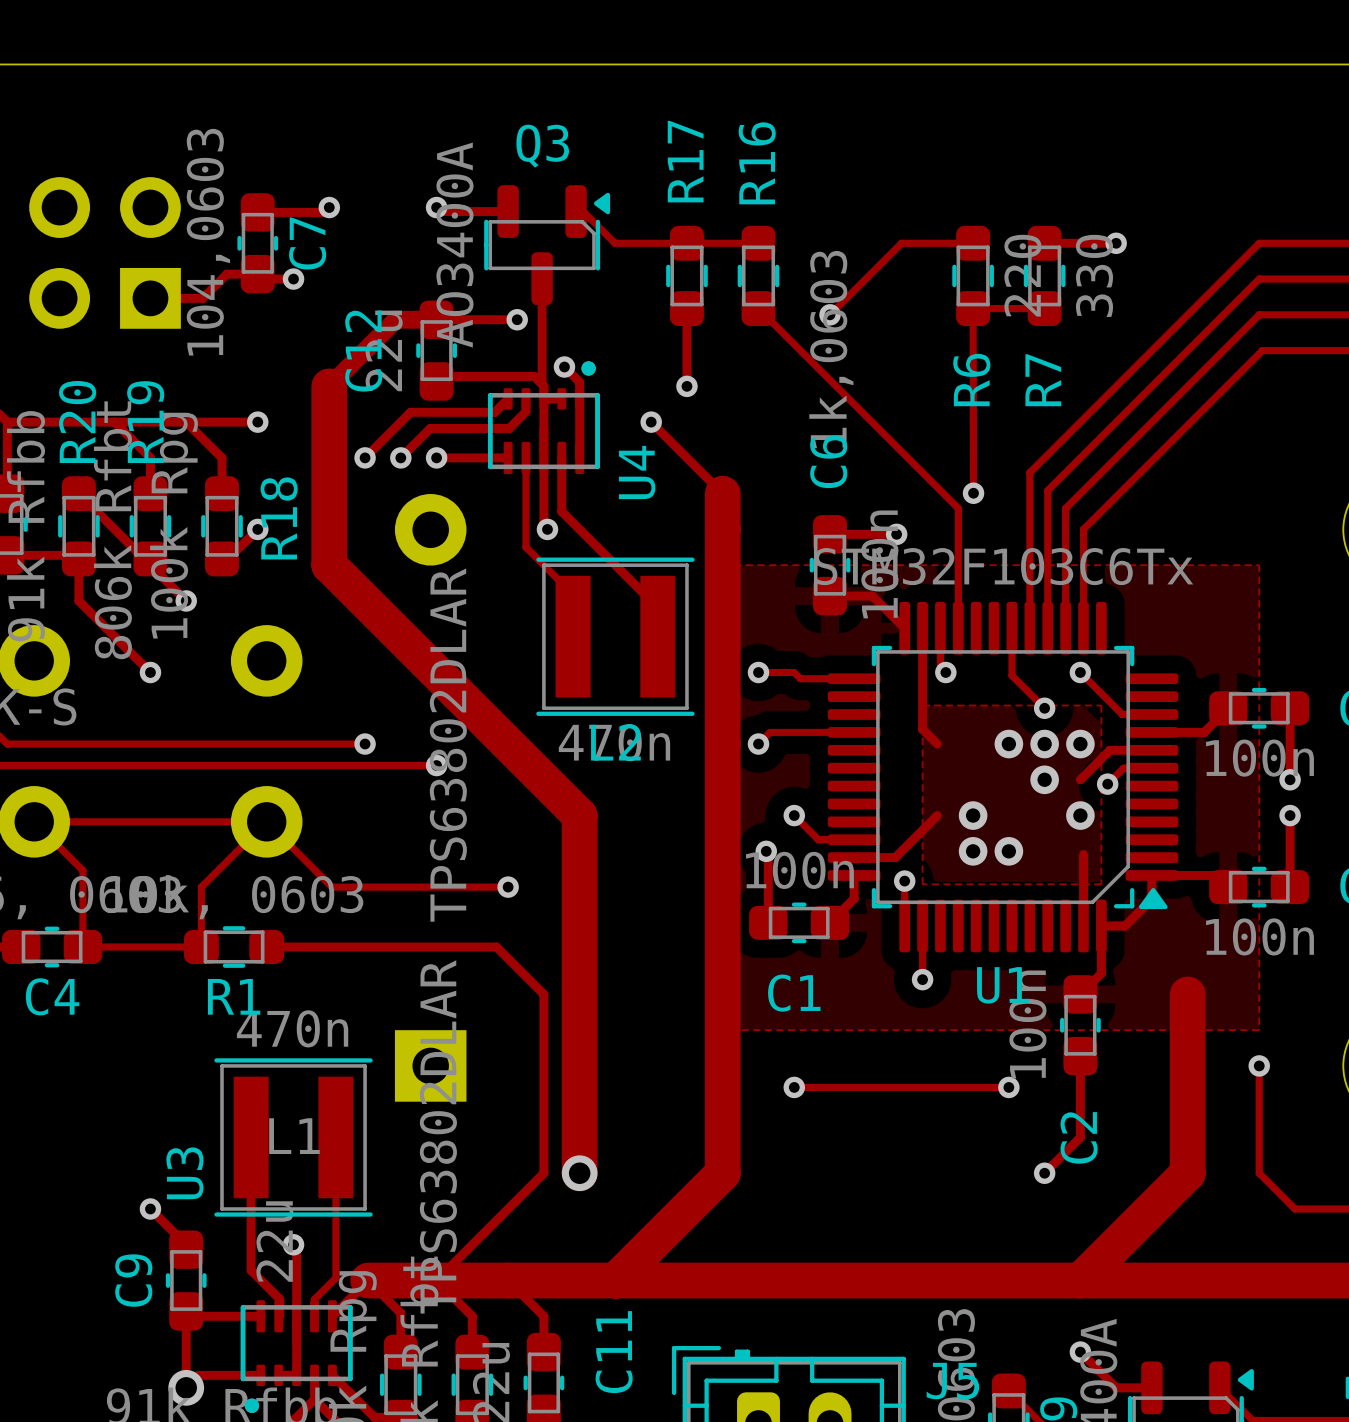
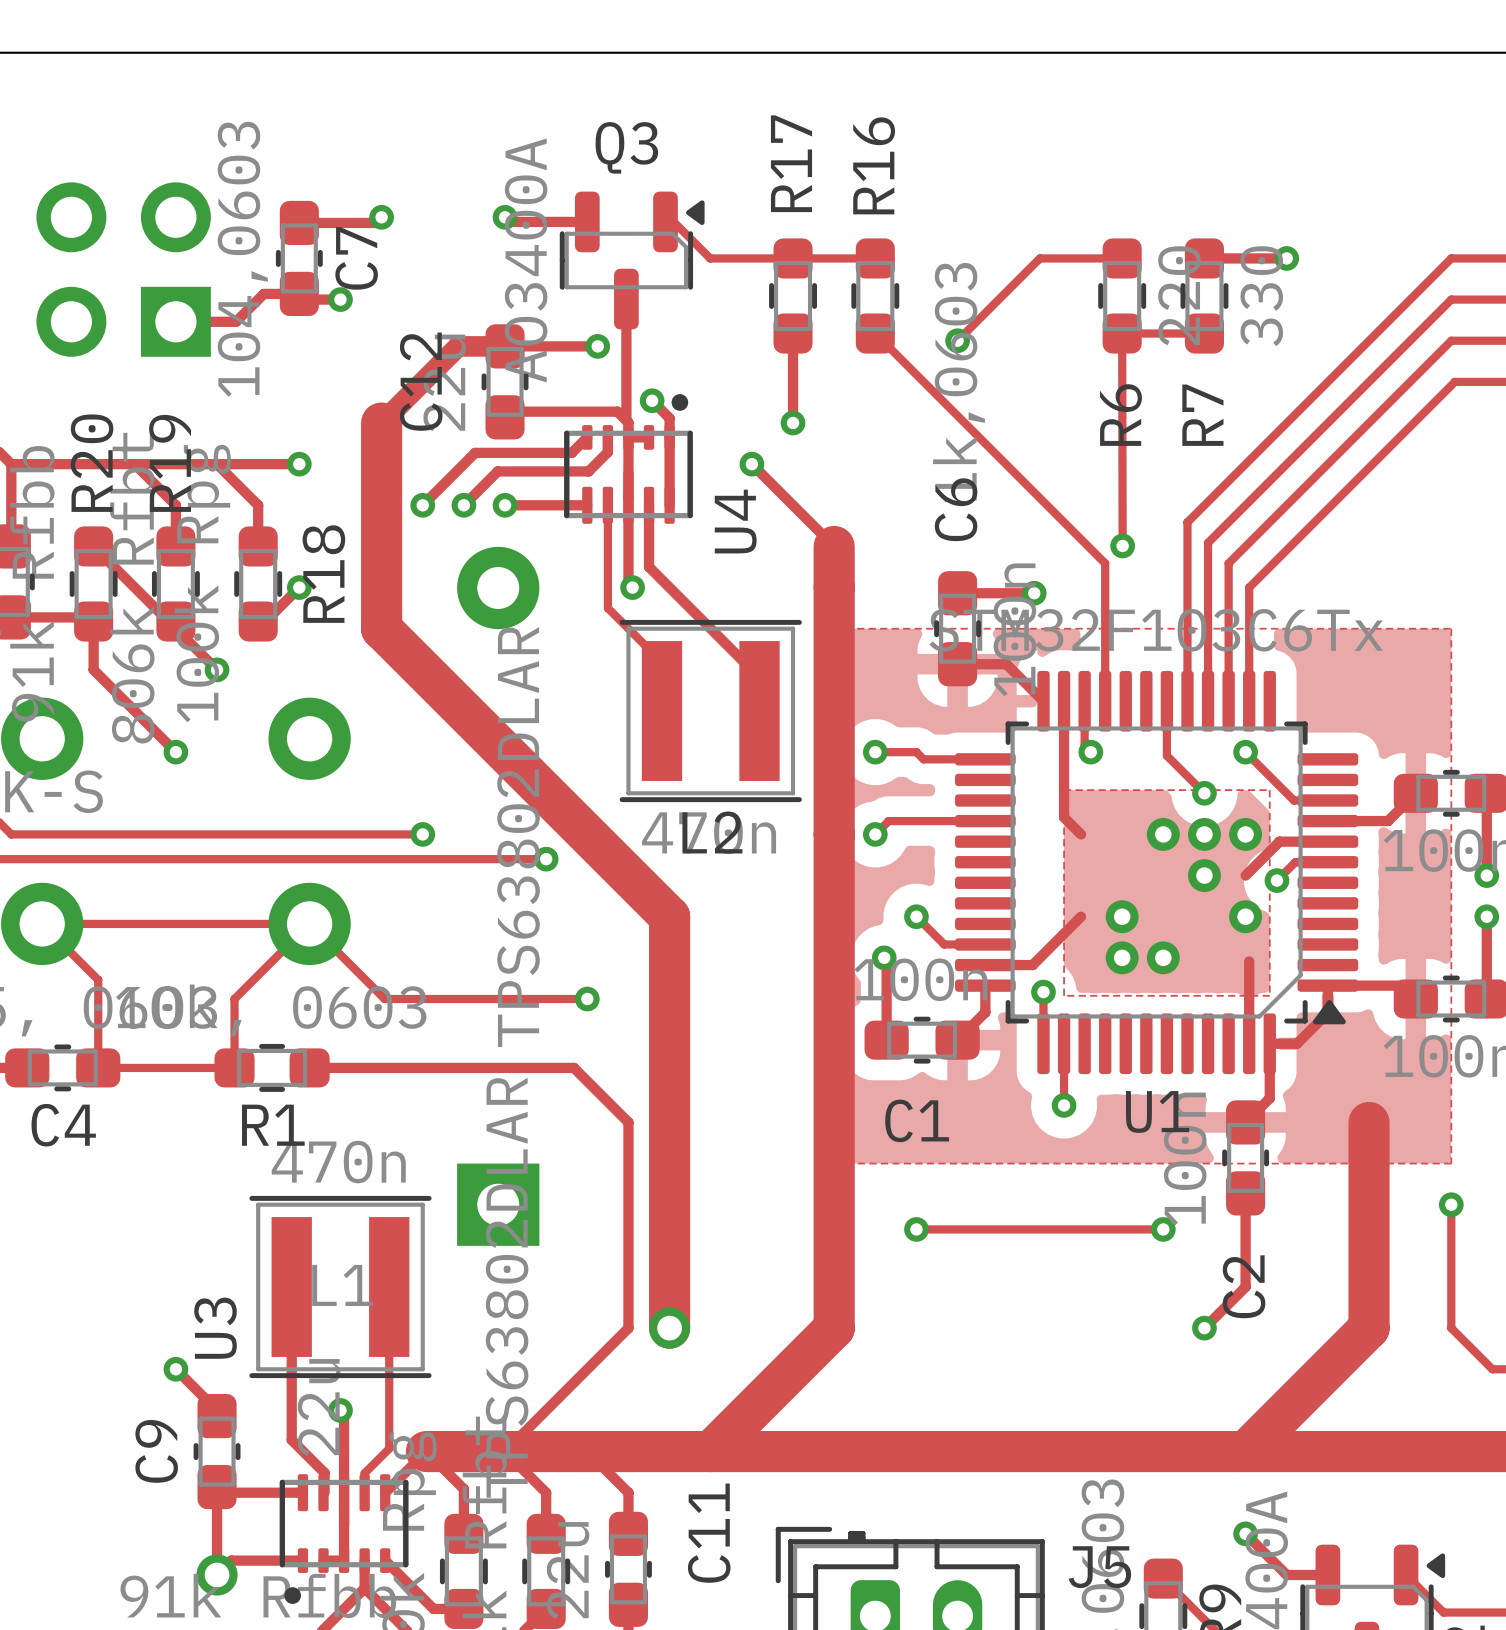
track: none -> (505, 859) (546, 859)
via position: (436, 765) -> (546, 859)

